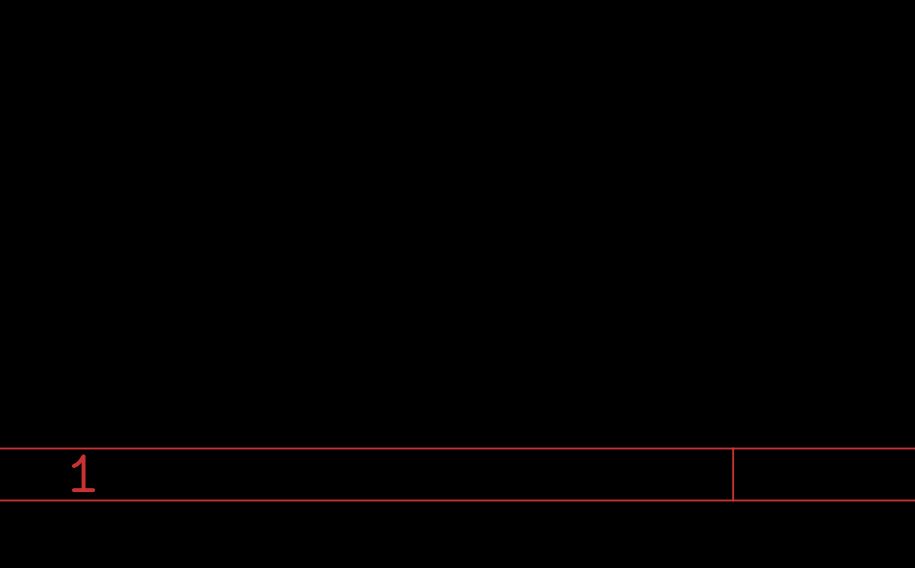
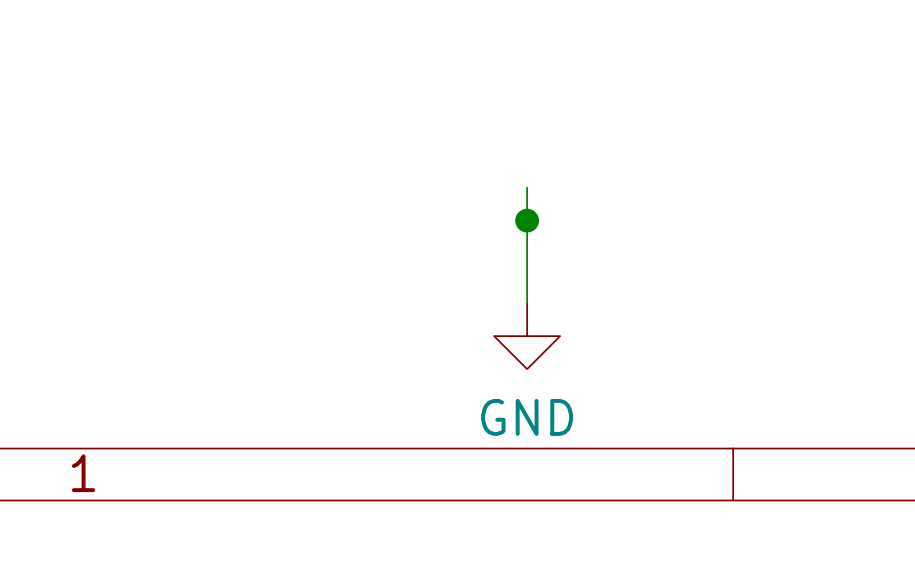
wire: none -> (527, 187) (527, 303)
junction: none -> (527, 220)
power symbol: none -> GND (527, 336)

